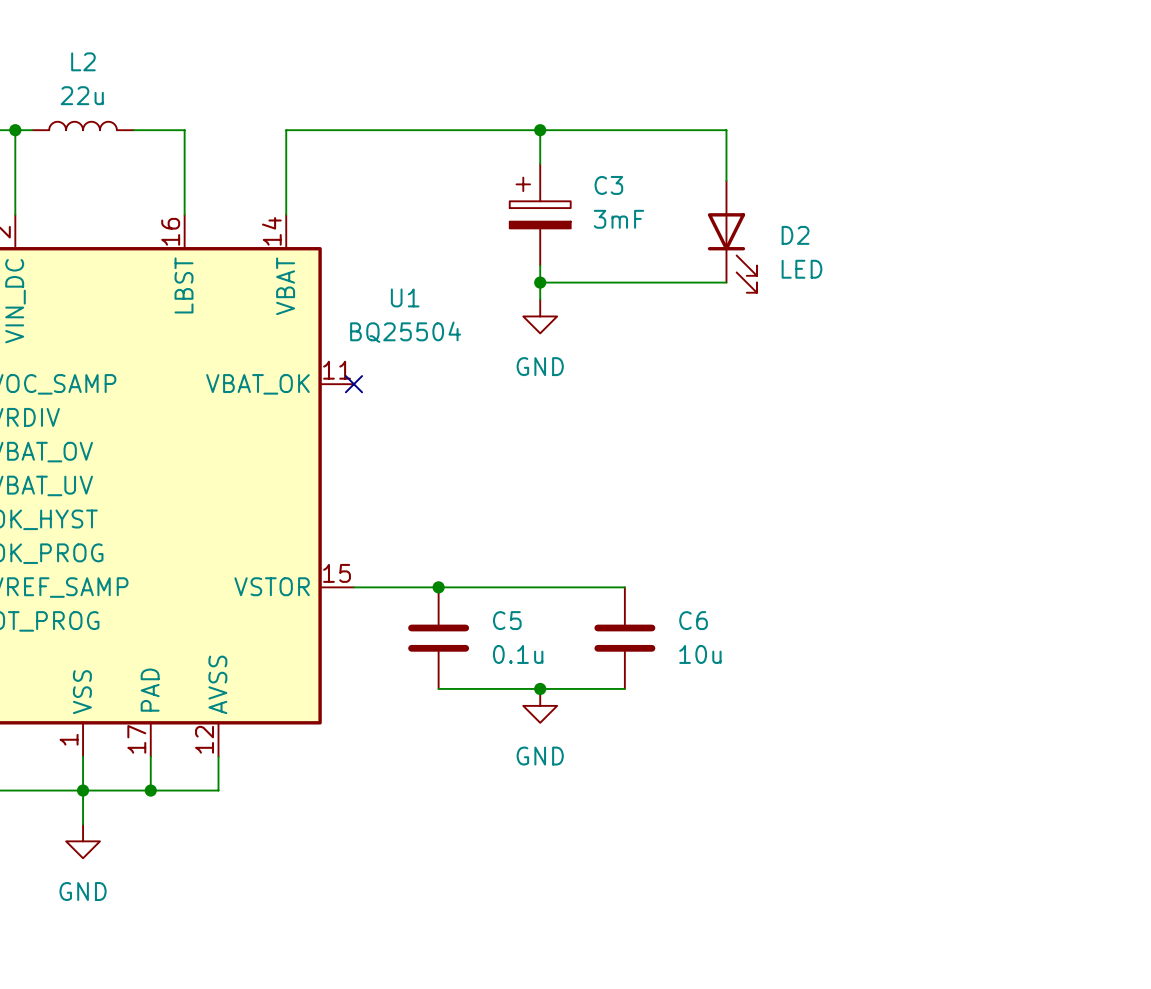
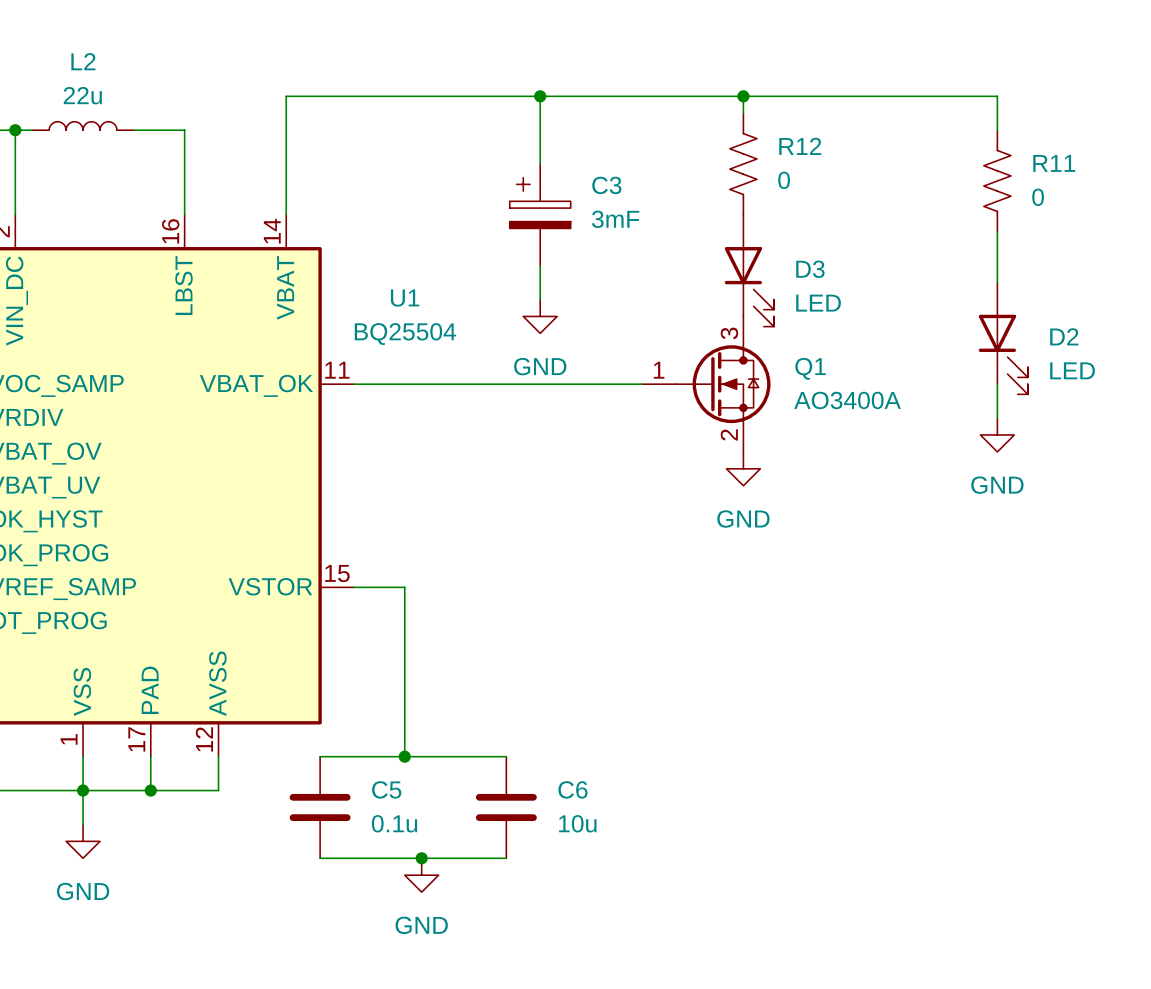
wire: none -> (540, 96) (540, 130)
wire: none -> (743, 96) (743, 113)
junction: none -> (743, 96)
wire: (286, 130) (726, 130) (726, 180) -> (286, 130) (286, 96) (997, 96) (997, 130)
junction position: (540, 130) -> (540, 96)
R12: none -> 0 (743, 164)
R11: none -> 0 (997, 180)
wire: none -> (997, 231) (997, 282)
D2 position: (732, 236) -> (1003, 338)
D3: none -> LED (749, 270)
wire: (540, 282) (726, 282) -> none
junction: (540, 282) -> none
wire: none -> (353, 384) (641, 384)
no-connect mark: (353, 384) -> none
Q1: none -> AO3400A (706, 384)
wire: none -> (997, 384) (997, 418)
power symbol: none -> GND (997, 434)
power symbol: none -> GND (743, 468)
wire: (404, 587) (624, 587) -> (404, 587) (404, 756)
junction: (438, 587) -> none
C5 position: (438, 638) -> (320, 807)
C6 position: (624, 638) -> (506, 807)
wire: (438, 688) (624, 688) -> (320, 756) (506, 756)
junction: (540, 688) -> none
power symbol: GND (540, 705) -> none
junction: none -> (404, 756)
wire: none -> (320, 858) (506, 858)
junction: none -> (421, 858)
power symbol: none -> GND (421, 875)

